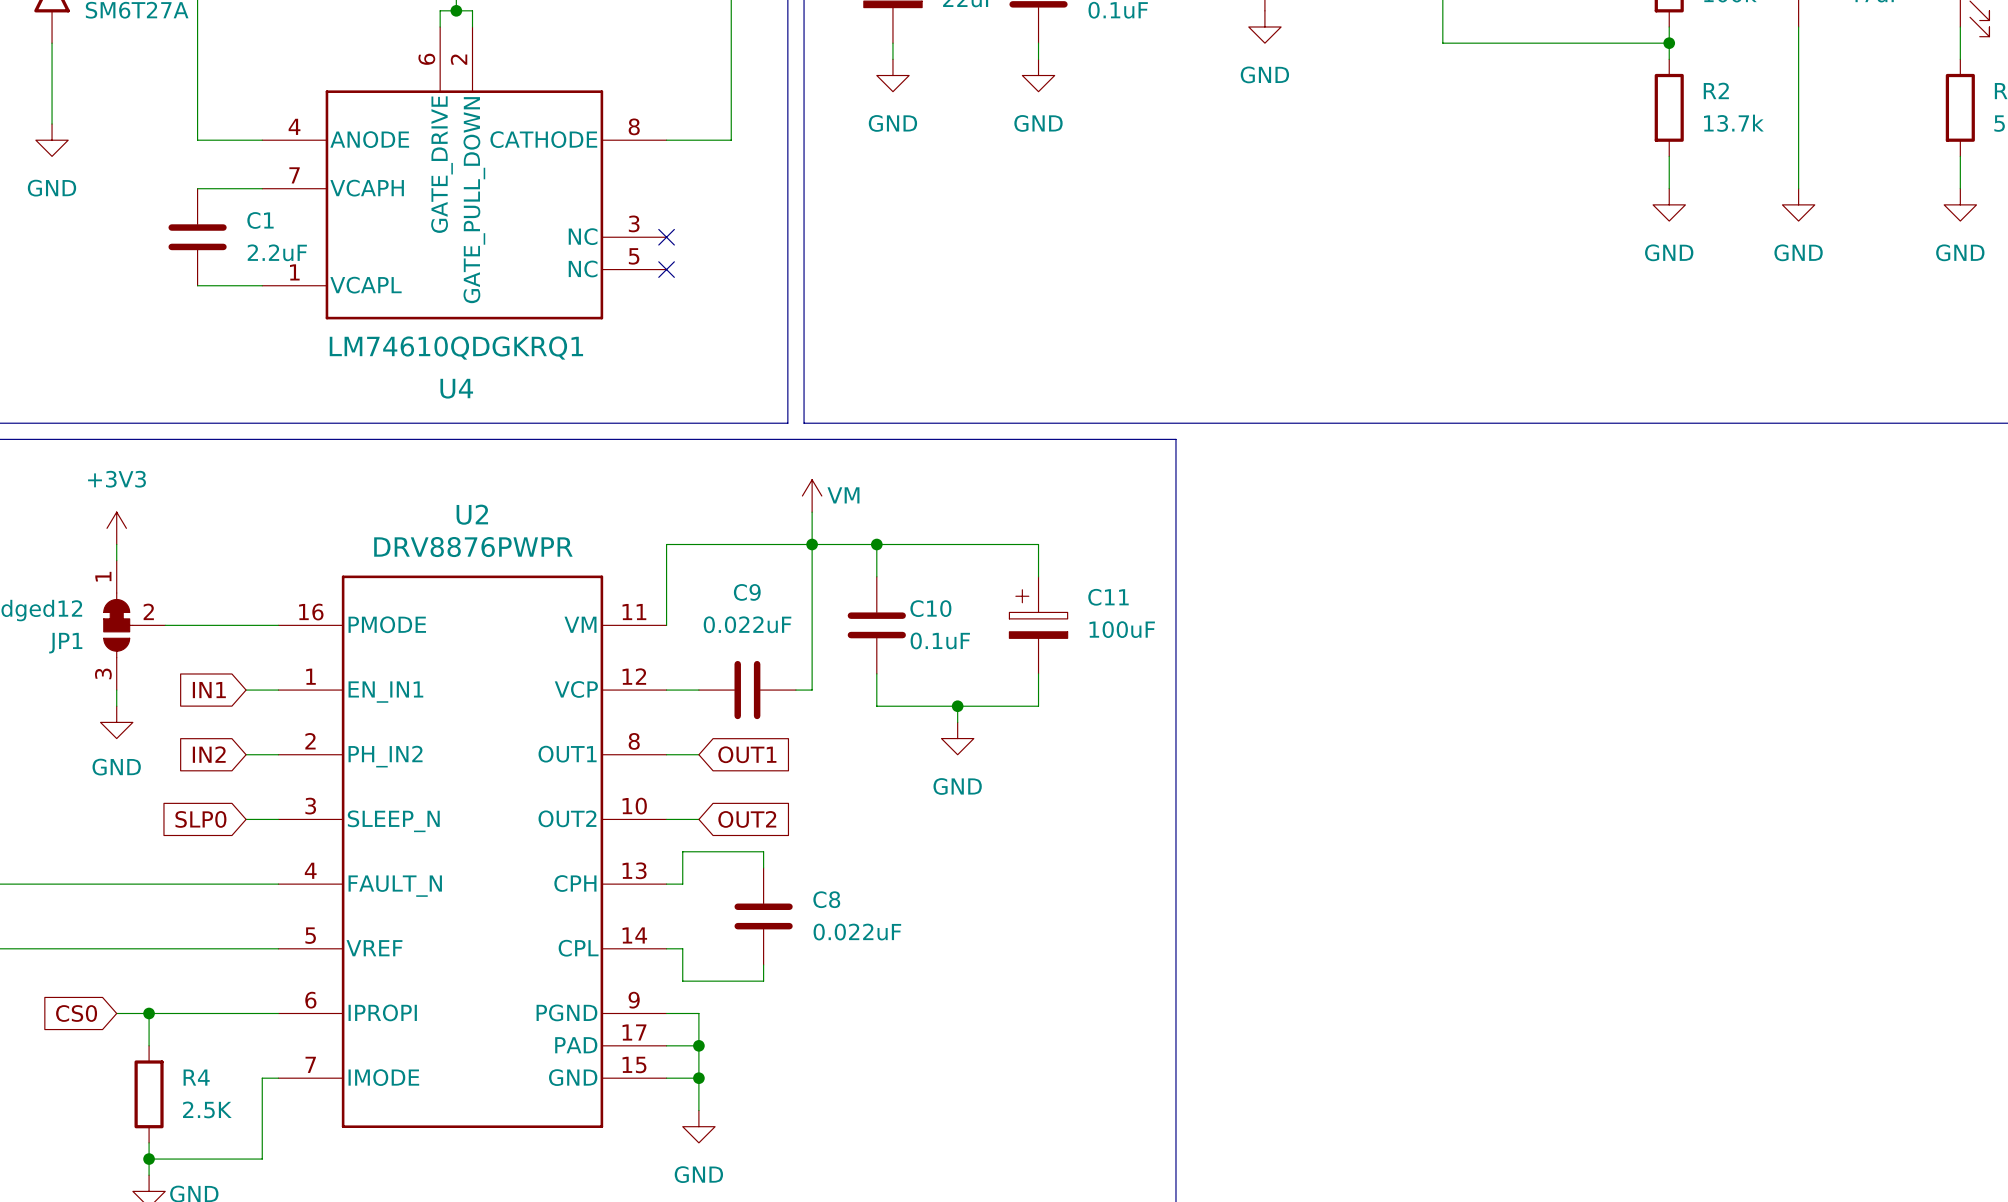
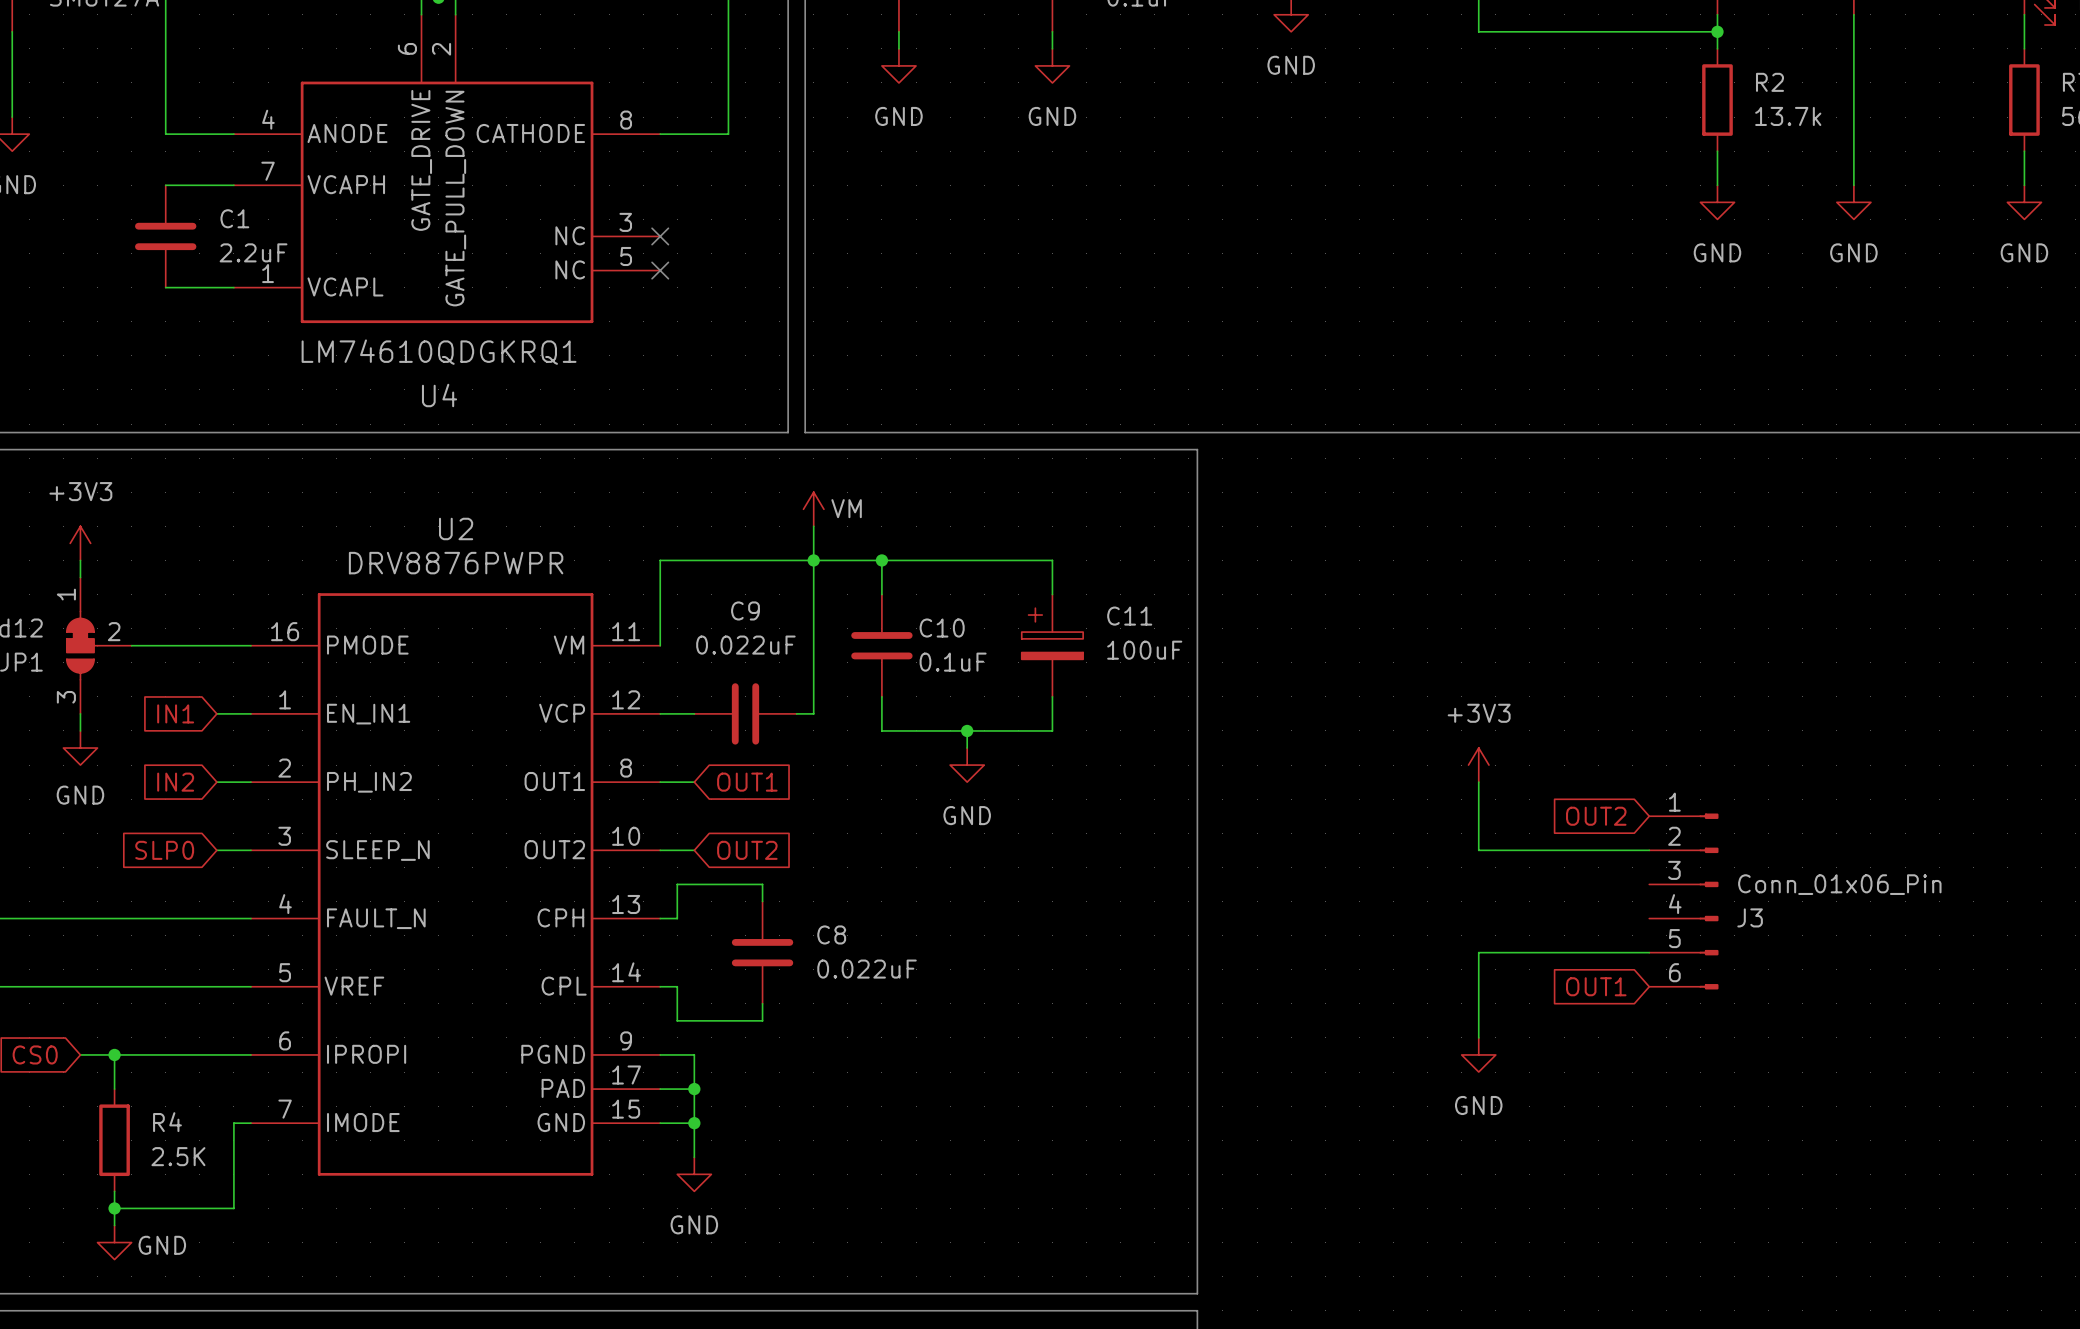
power symbol: none -> +3V3 (1478, 765)
wire: none -> (1478, 782) (1478, 850) (1649, 850)
global label: none -> OUT2 (1596, 816)
J3: none -> Conn_01x06_Pin (1683, 901)
wire: none -> (1649, 952) (1478, 952) (1478, 1037)
global label: none -> OUT1 (1596, 986)
power symbol: none -> GND (1478, 1054)

